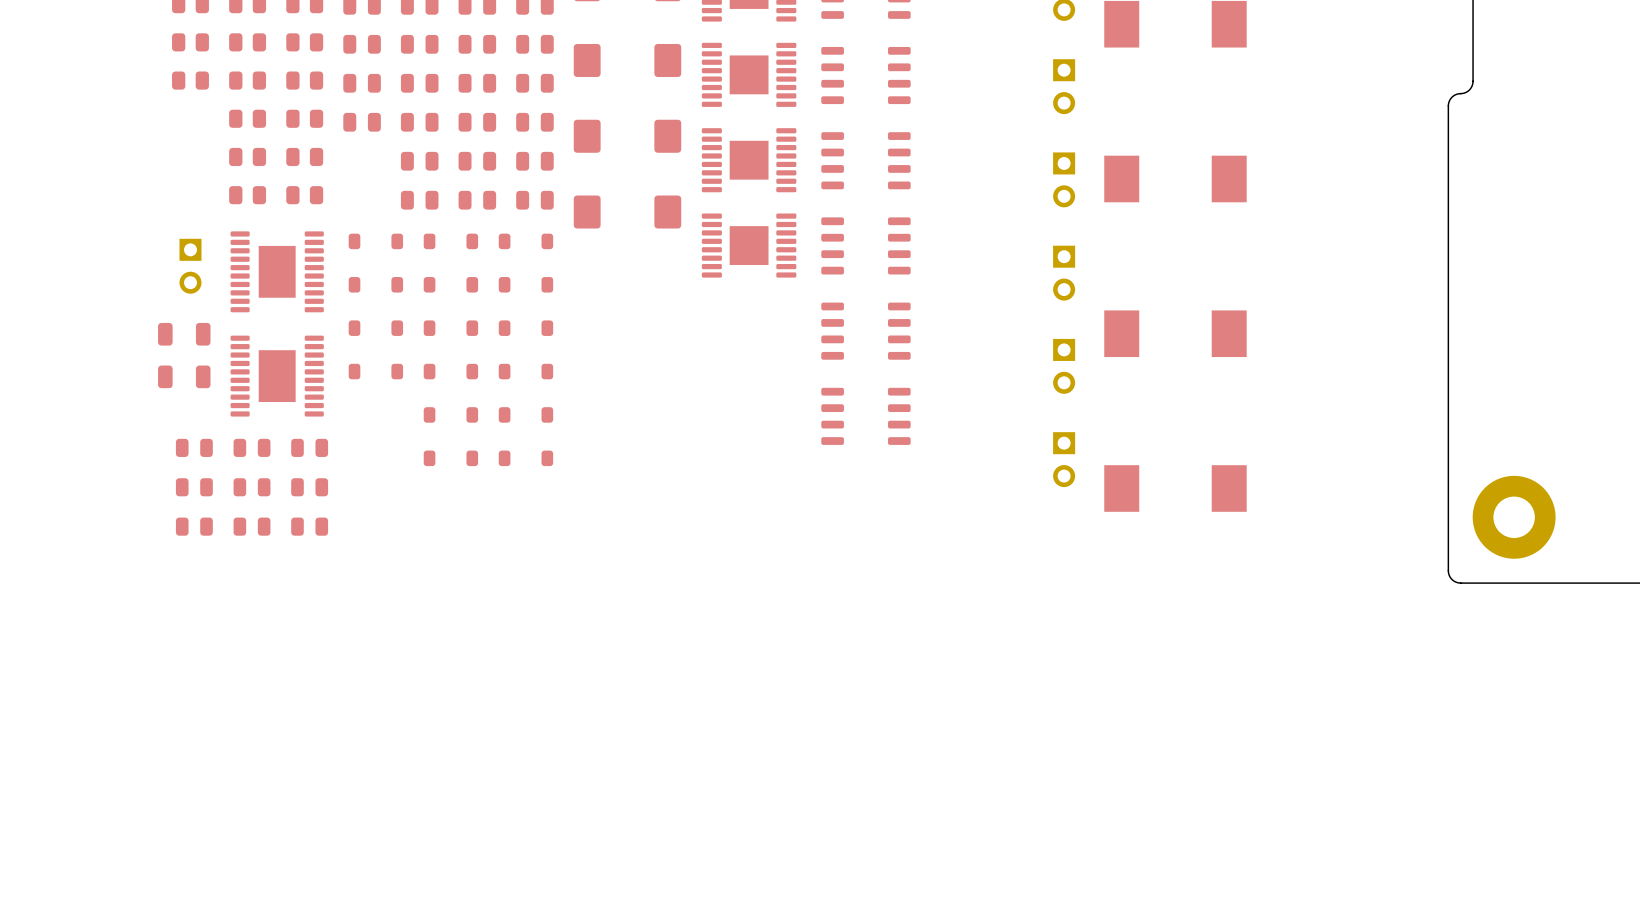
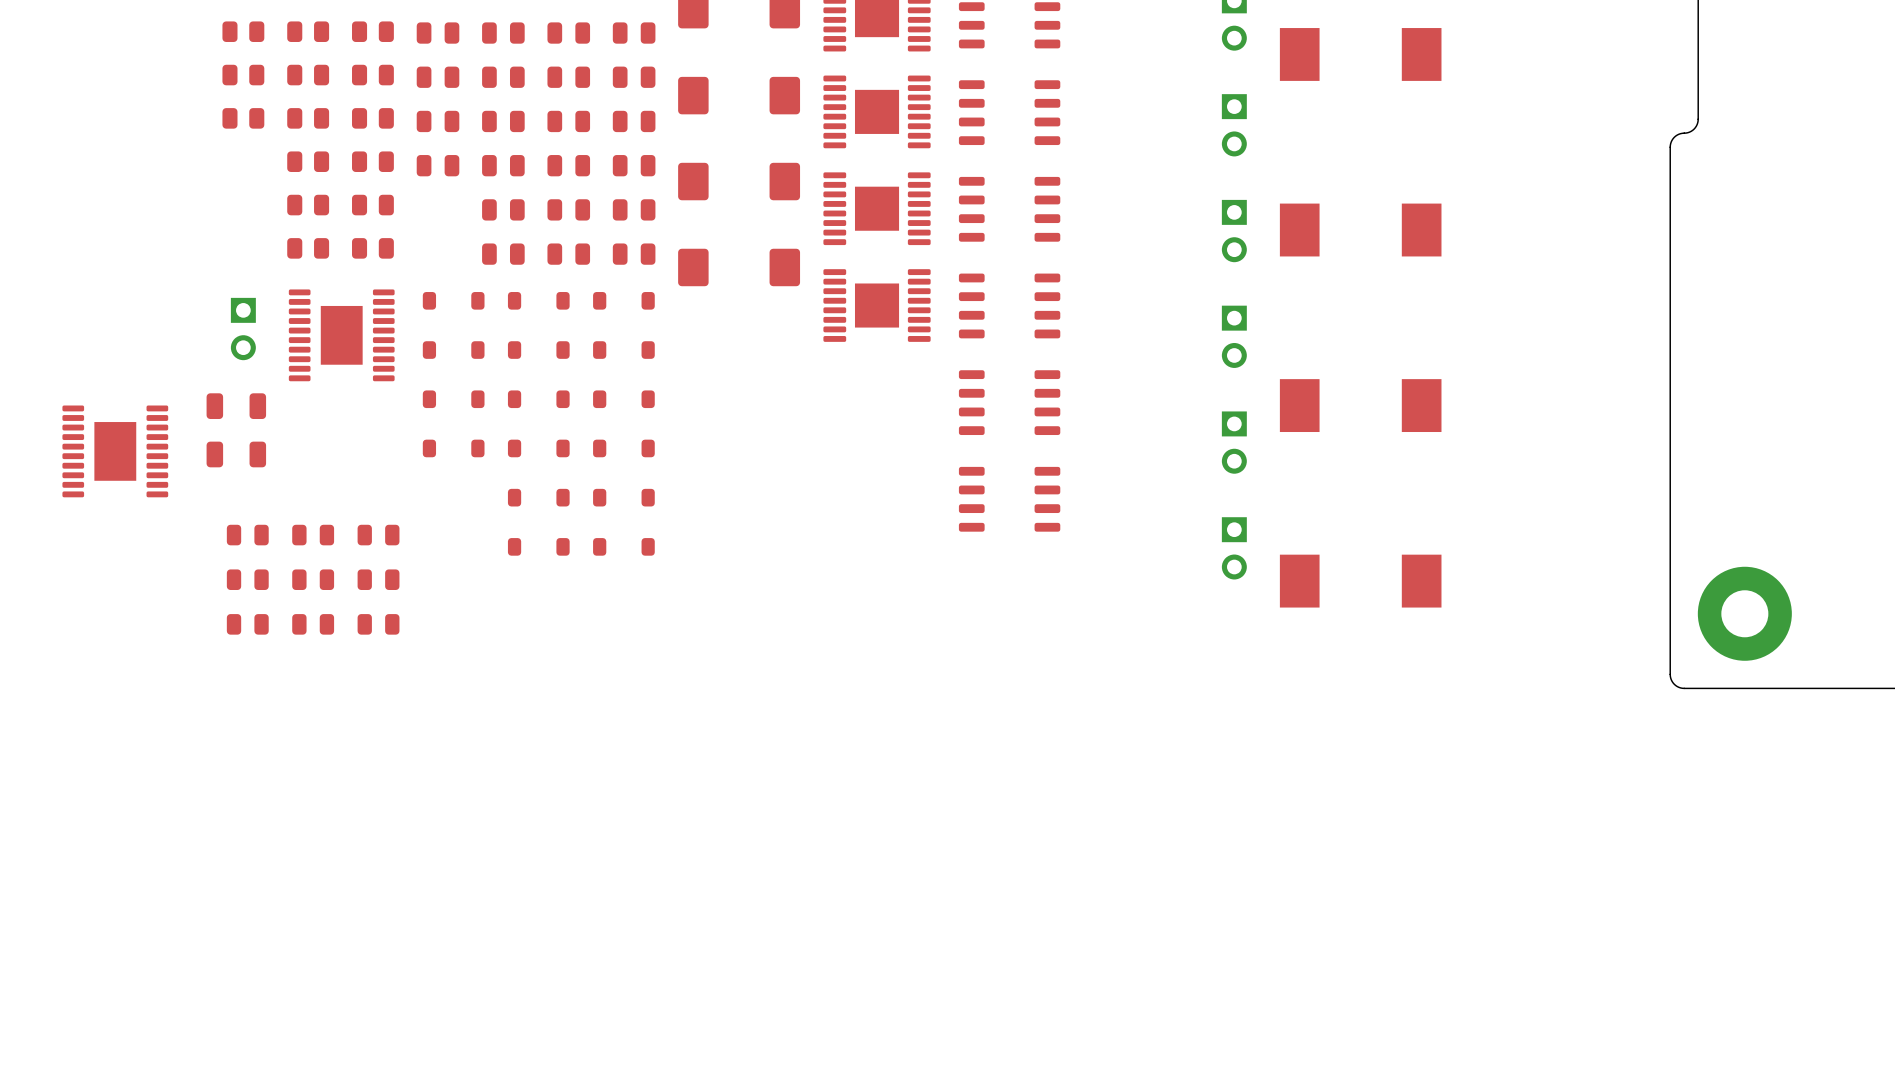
part position: (277, 376) -> (115, 451)

